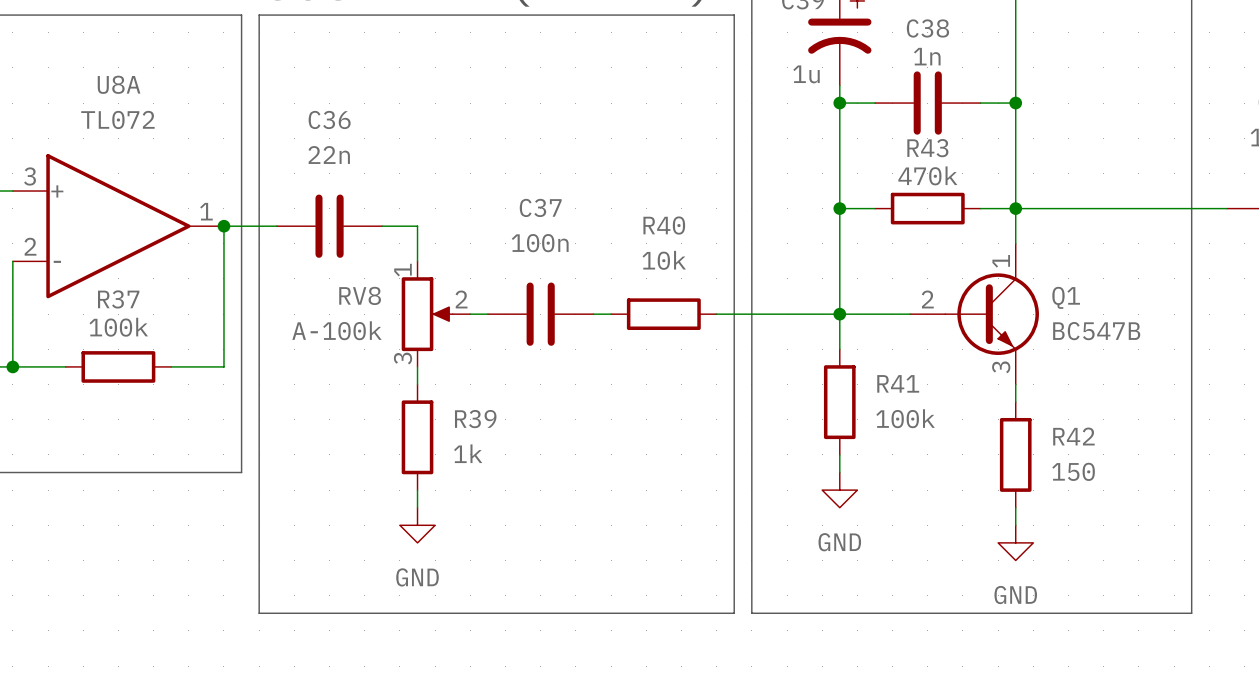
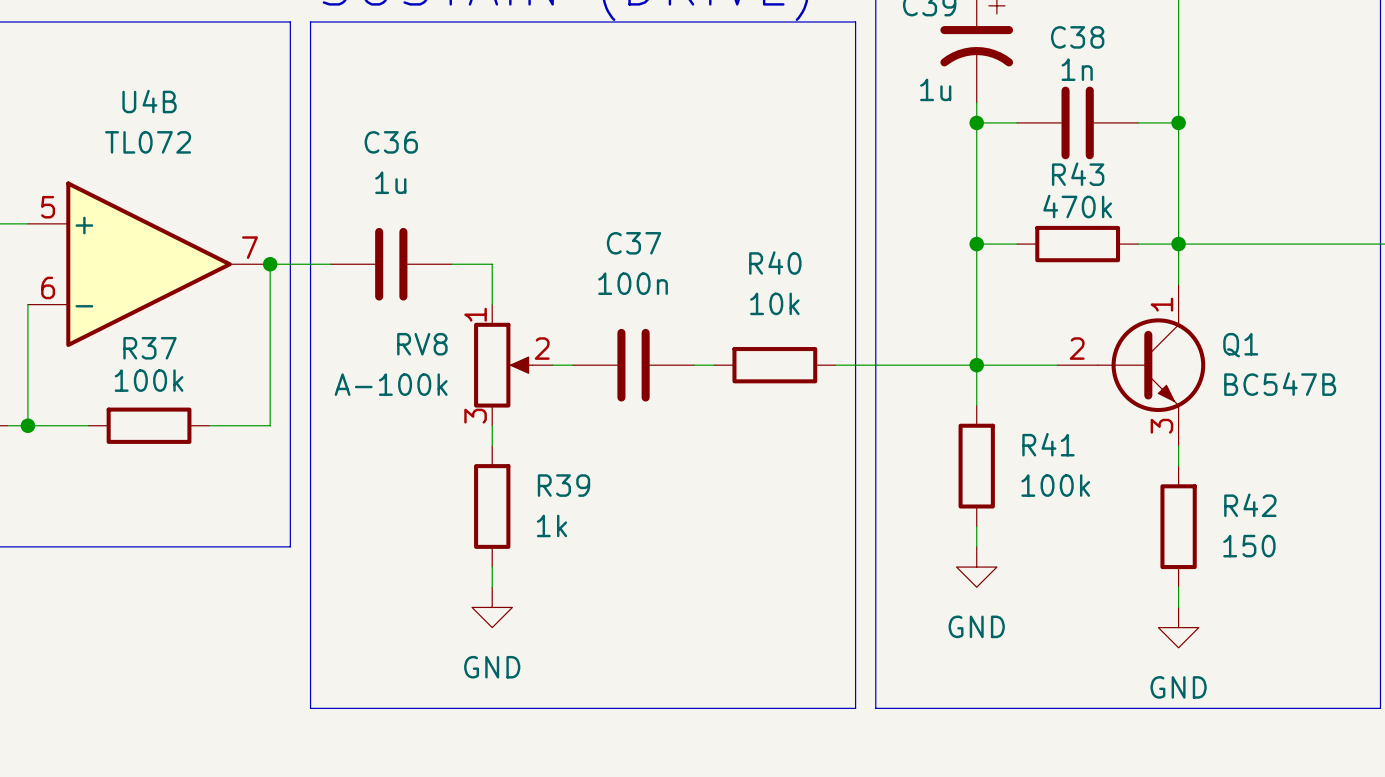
U8A name: U8A (119, 84) -> U4B (149, 101)
C36 value: 22n (329, 155) -> 1u (390, 182)
U8A pin number: 3 (30, 176) -> 5 (48, 207)
U8A pin number: 1 (206, 211) -> 7 (249, 247)
U8A pin number: 2 (30, 246) -> 6 (48, 287)

